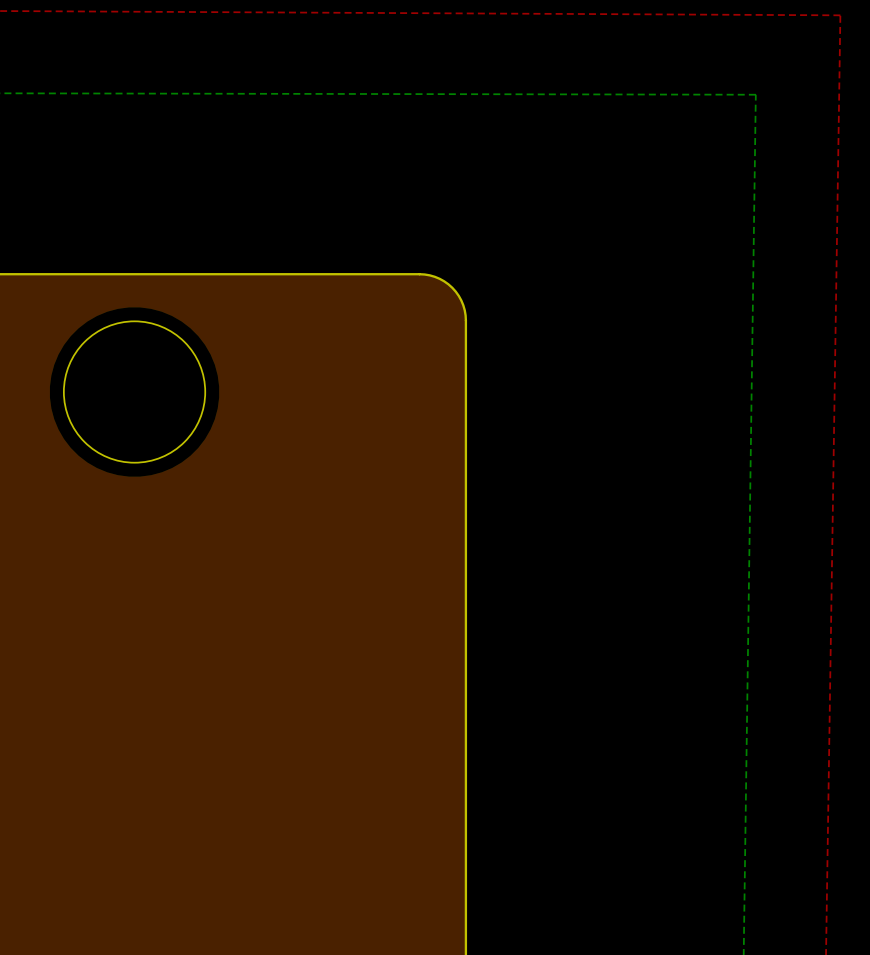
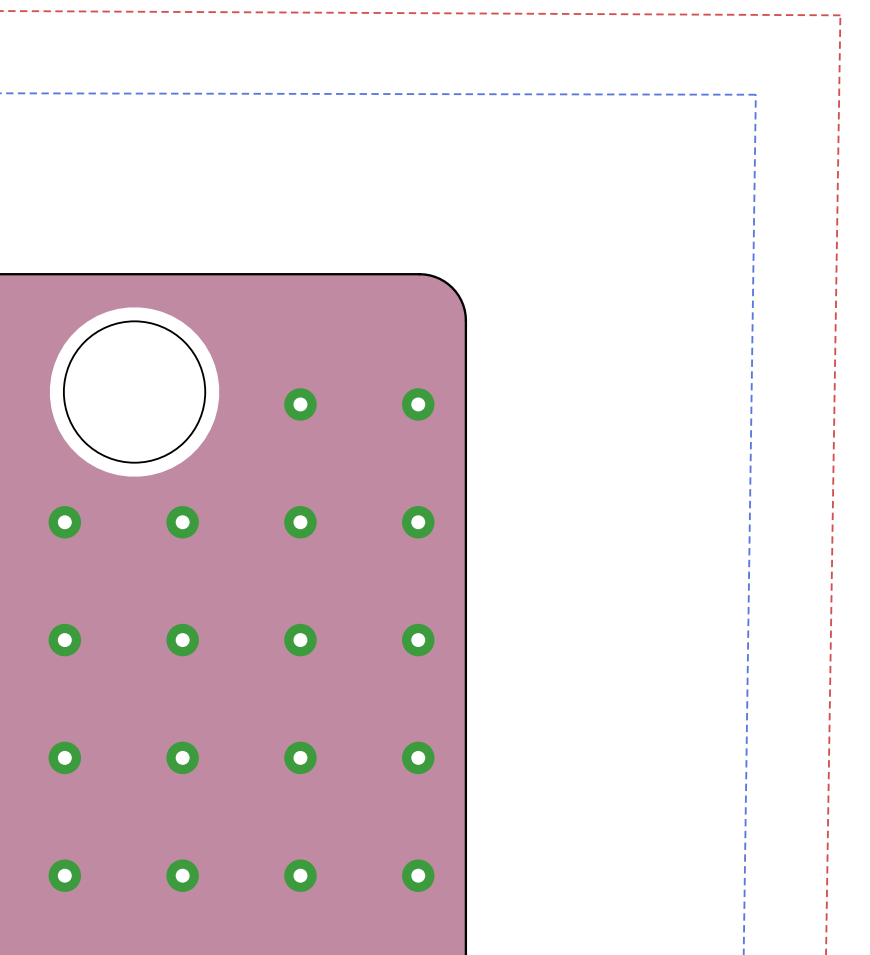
via: none -> (300, 404)
via: none -> (418, 404)
via: none -> (64, 522)
via: none -> (182, 522)
via: none -> (300, 522)
via: none -> (418, 522)
via: none -> (64, 640)
via: none -> (182, 640)
via: none -> (300, 640)
via: none -> (418, 640)
via: none -> (64, 757)
via: none -> (182, 757)
via: none -> (300, 757)
via: none -> (418, 757)
via: none -> (64, 875)
via: none -> (182, 875)
via: none -> (300, 875)
via: none -> (418, 875)

